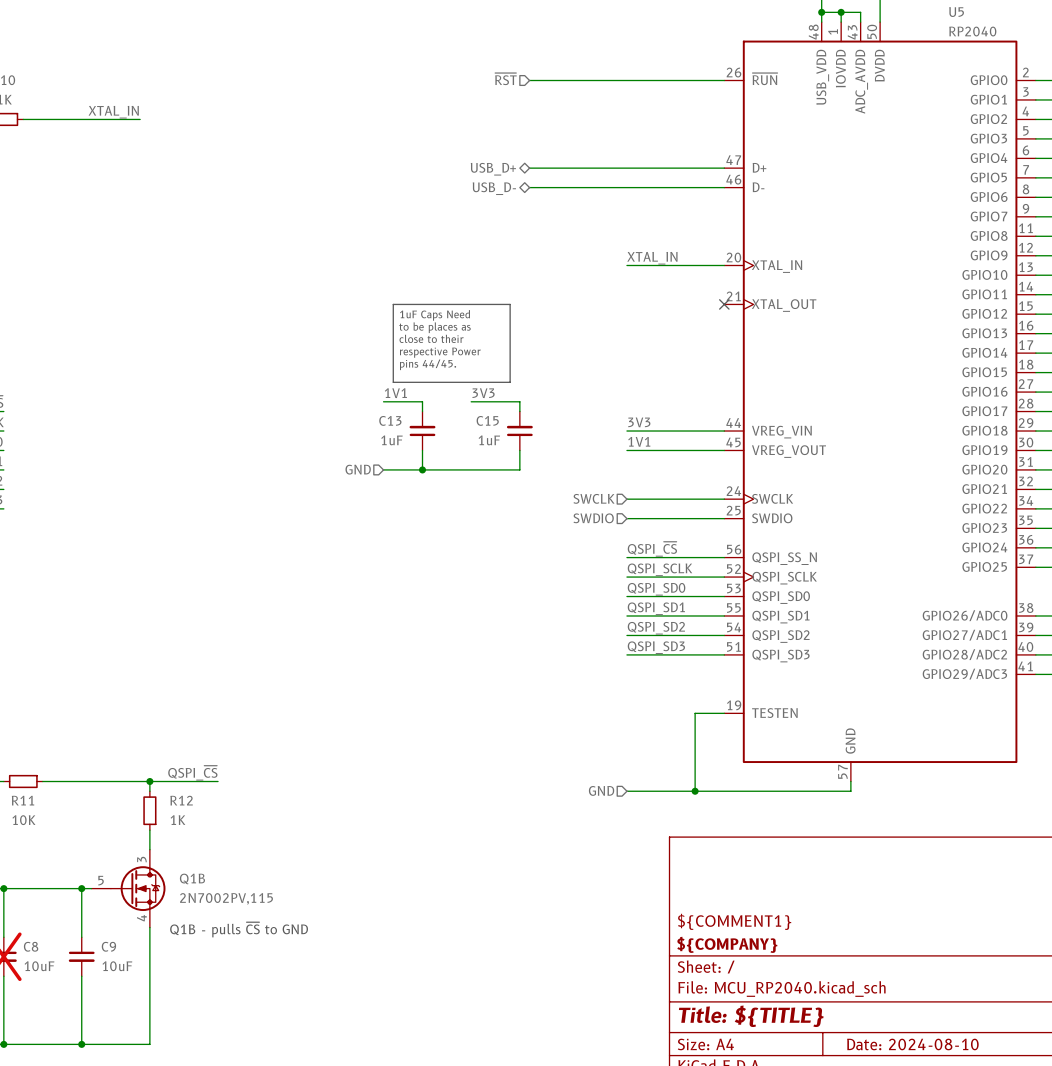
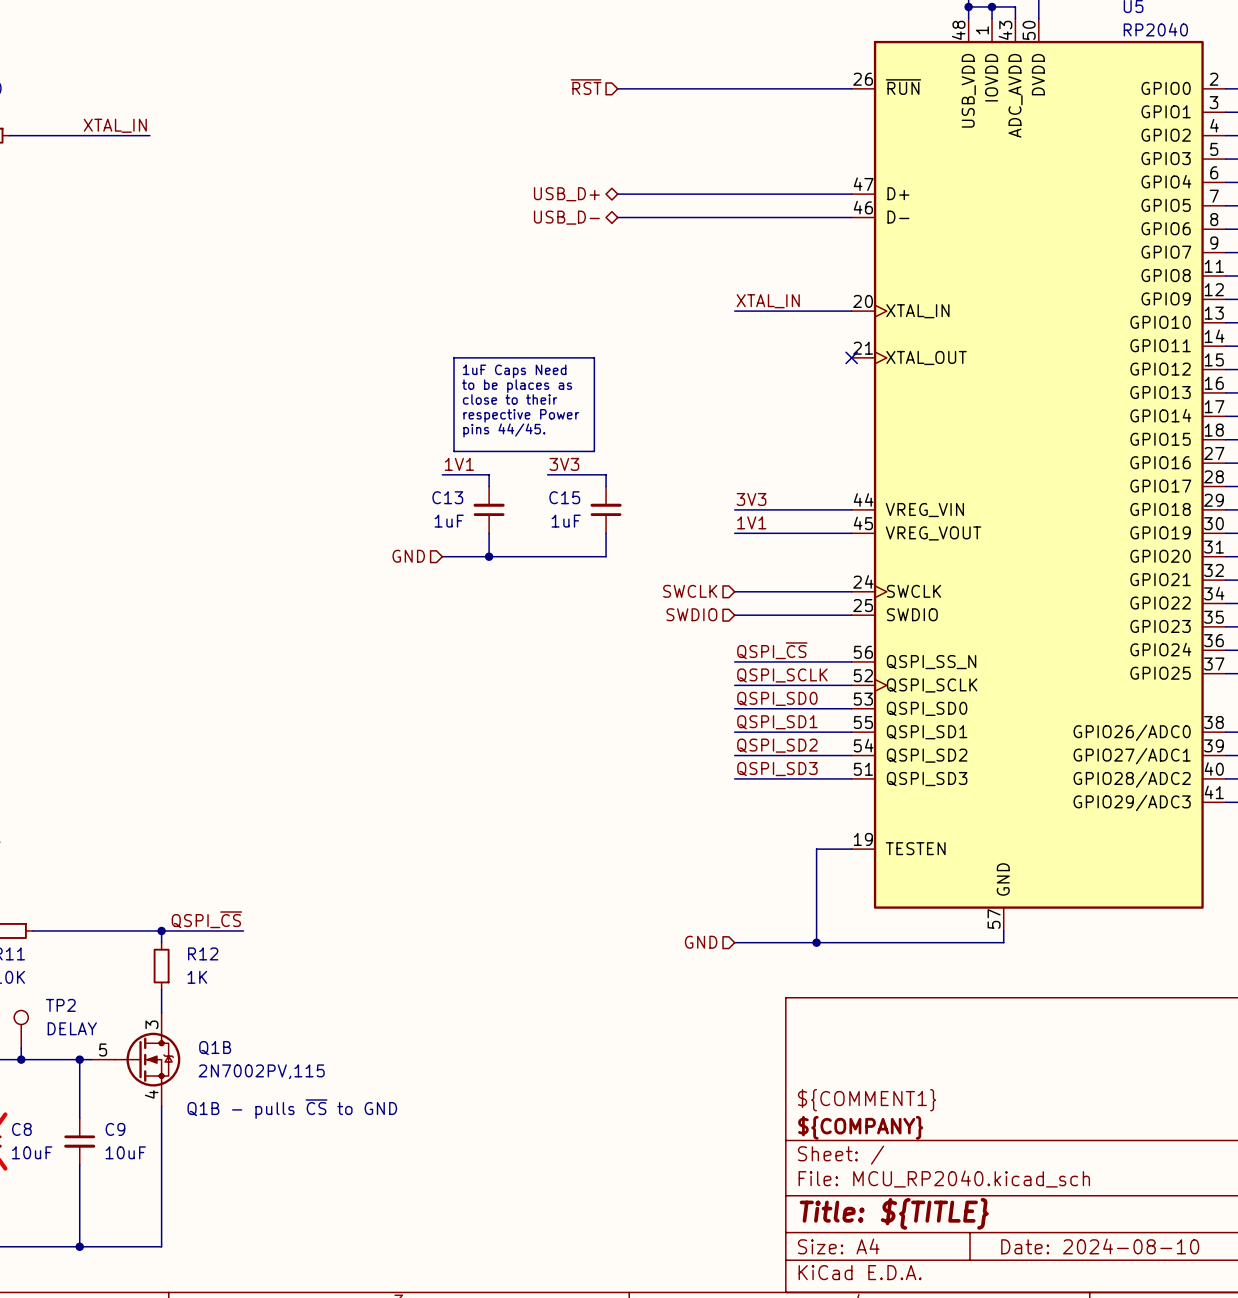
TP2: none -> DELAY (21, 1029)
wire: none -> (21, 1047) (21, 1059)
junction: none -> (21, 1059)

